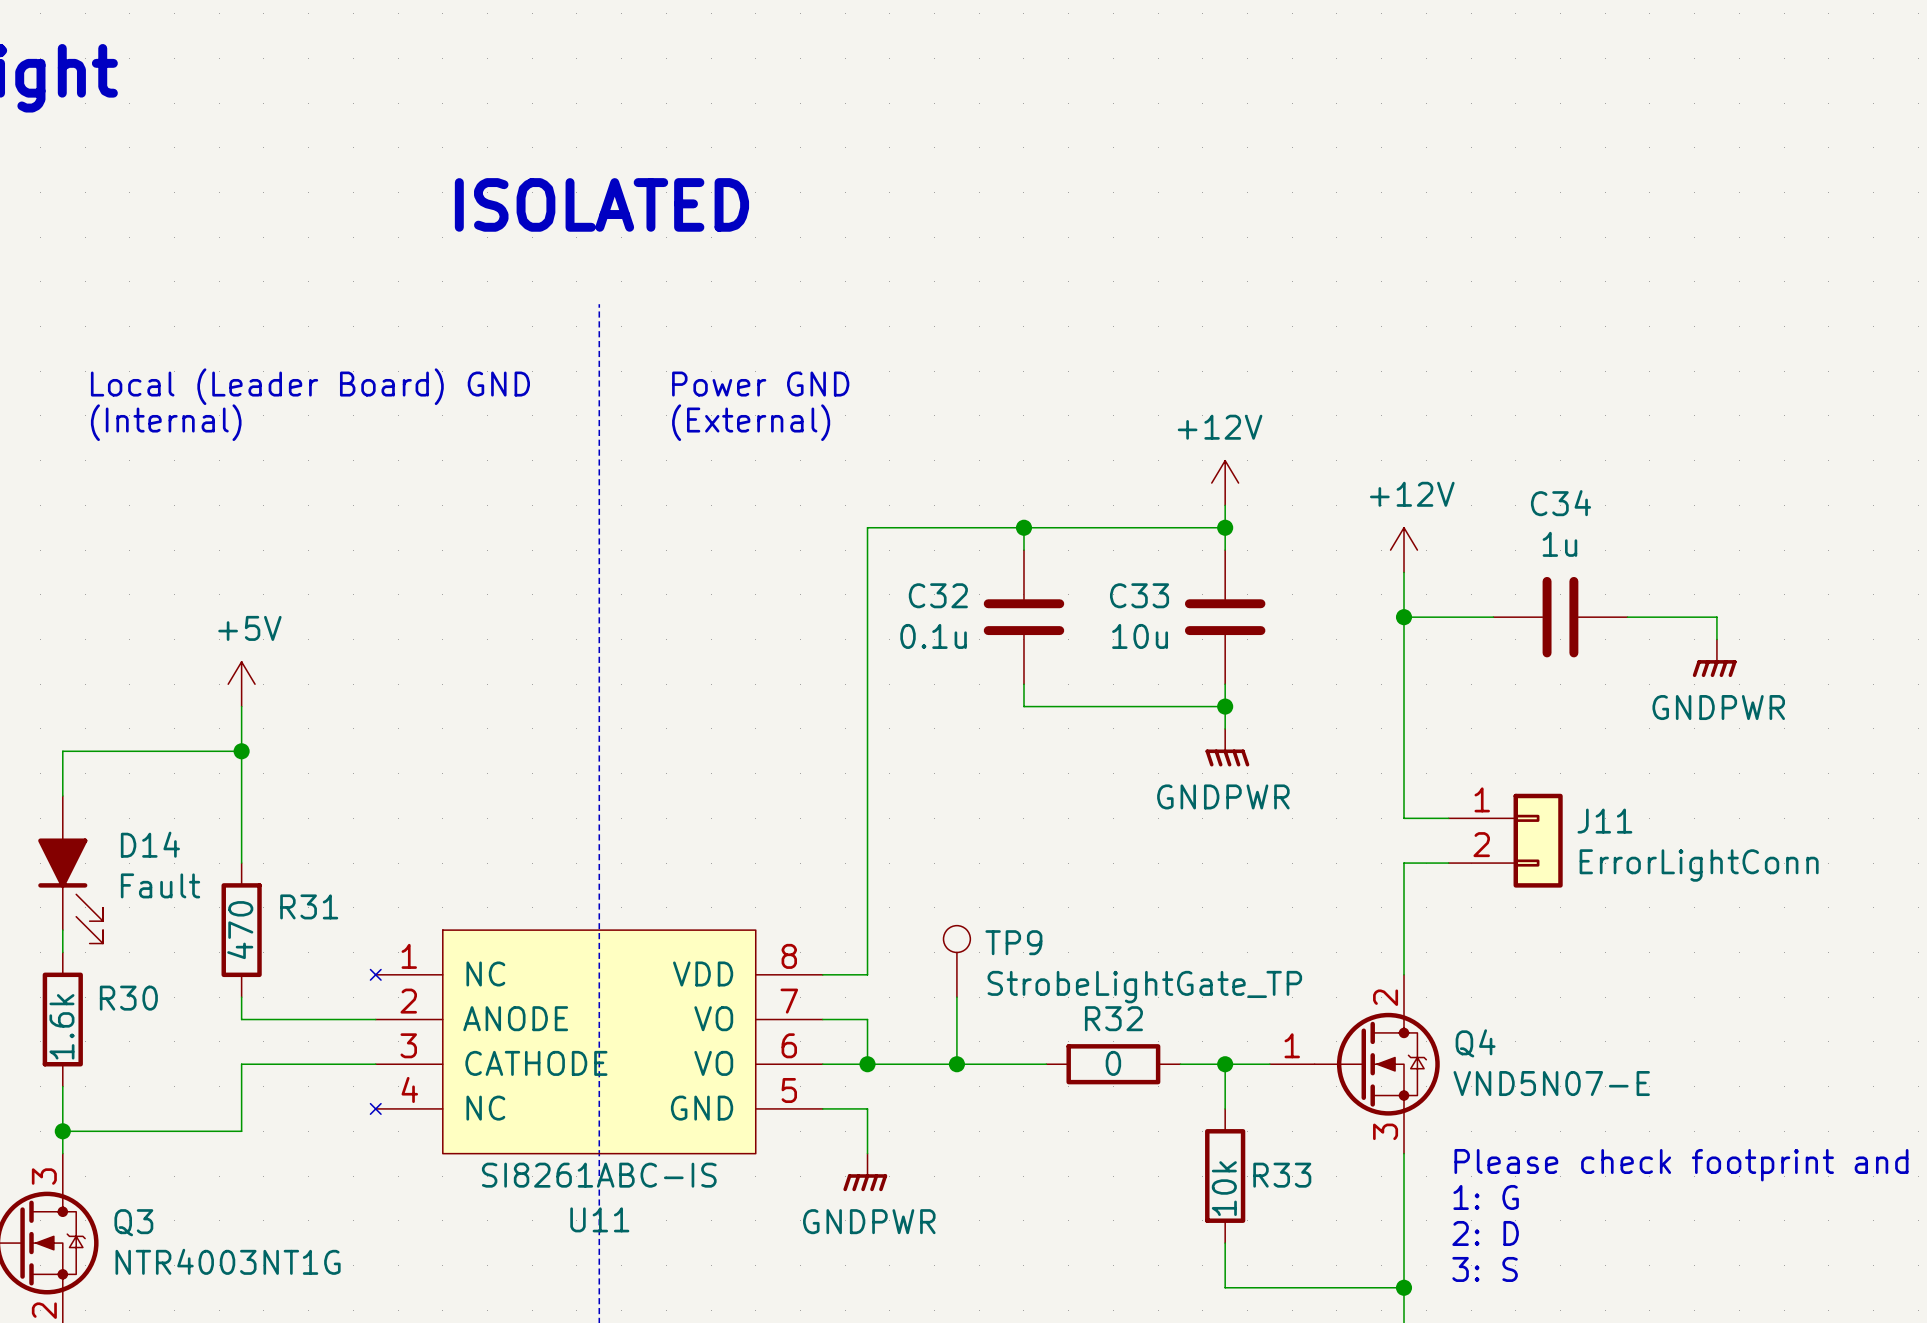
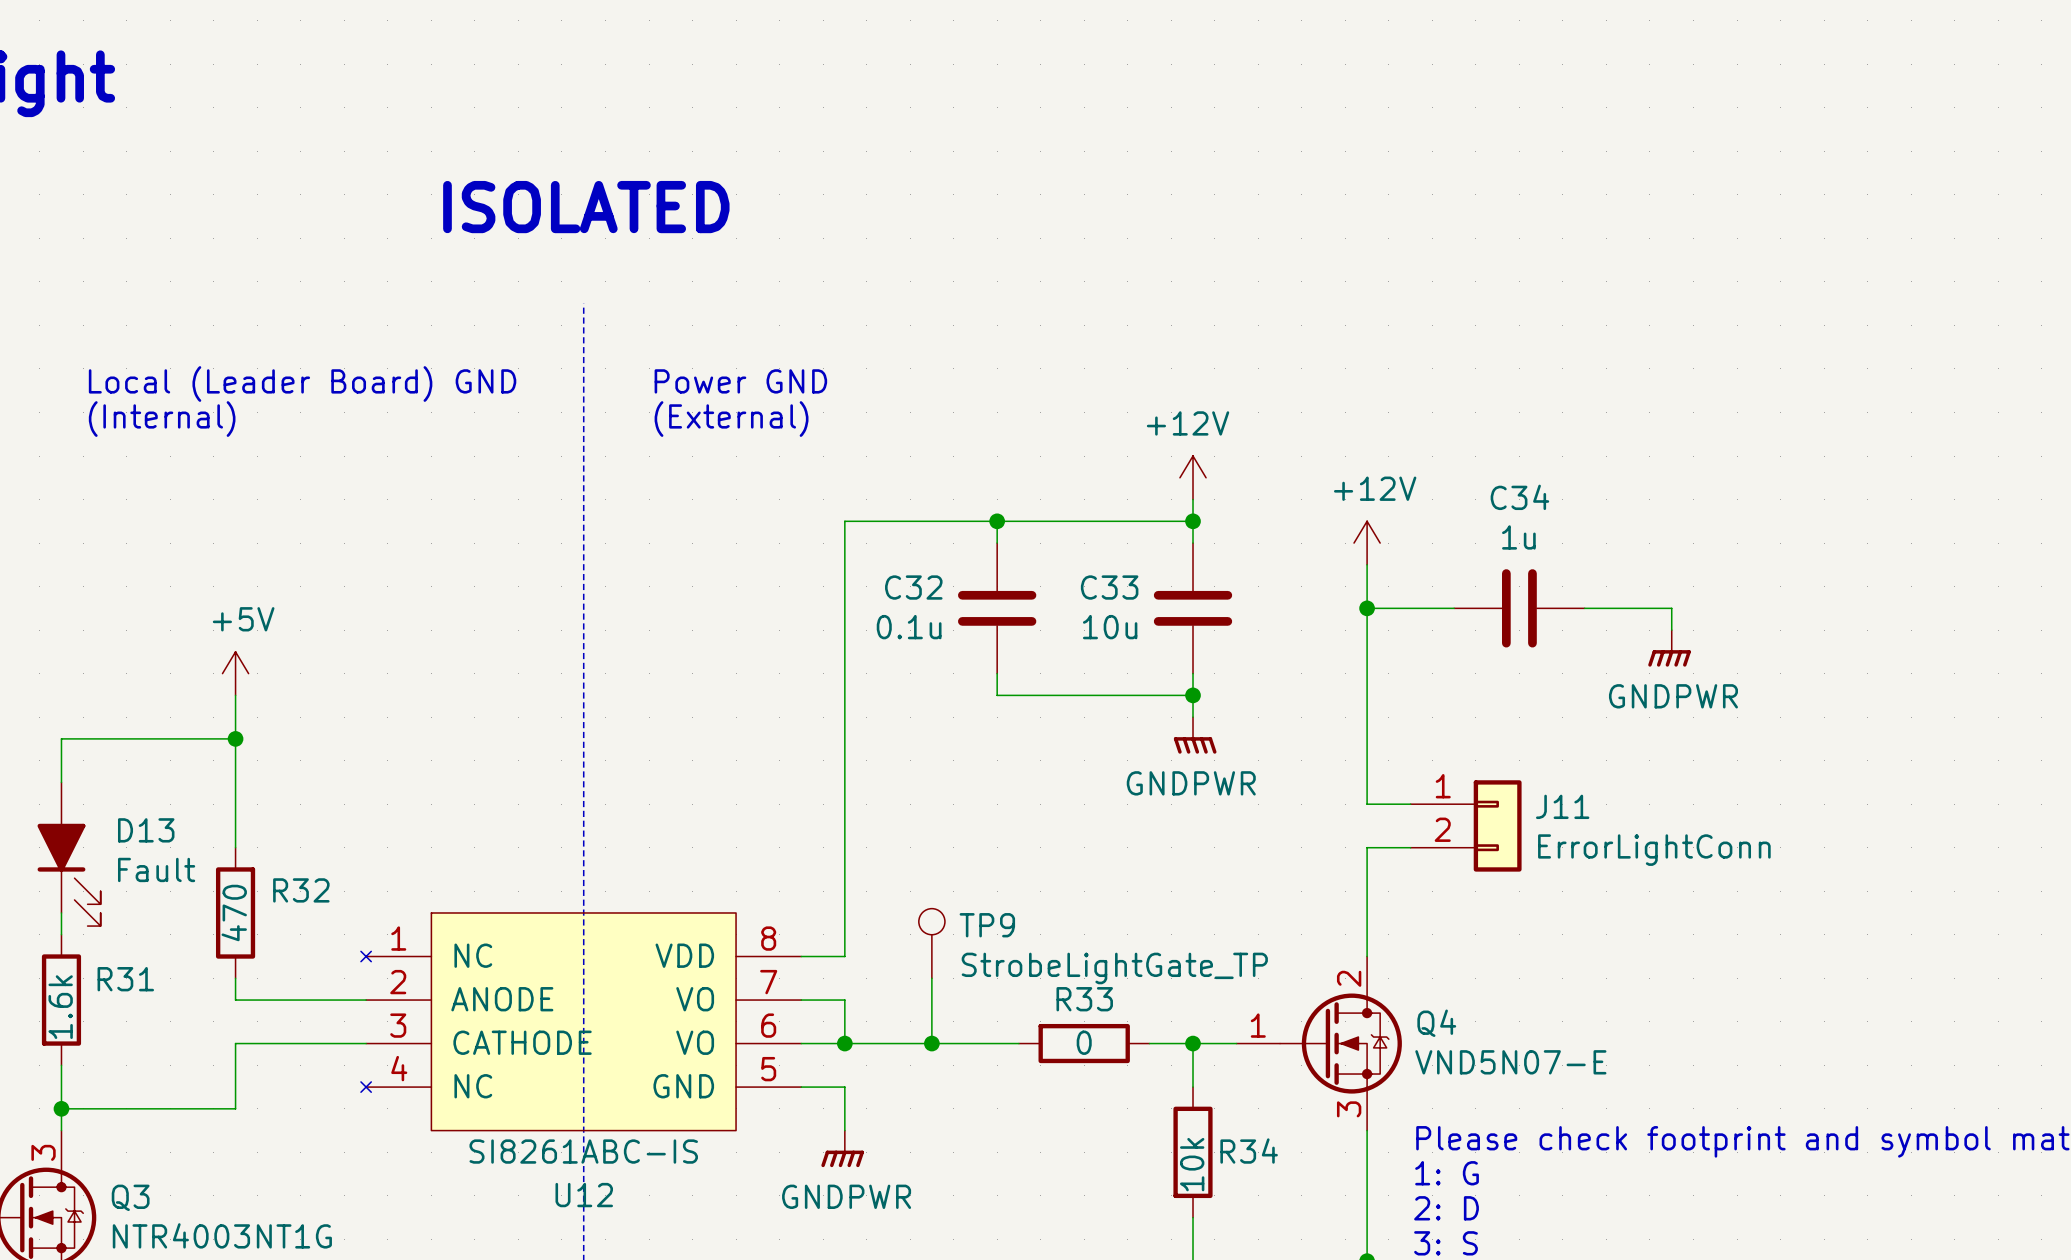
D14 name: D14 (150, 844) -> D13 (146, 830)
R31 name: R31 (309, 906) -> R32 (301, 890)
R30 name: R30 (128, 998) -> R31 (125, 979)
R32 name: R32 (1113, 1018) -> R33 (1084, 999)
R33 name: R33 (1282, 1175) -> R34 (1249, 1151)
U11 name: U11 (599, 1219) -> U12 (584, 1195)

